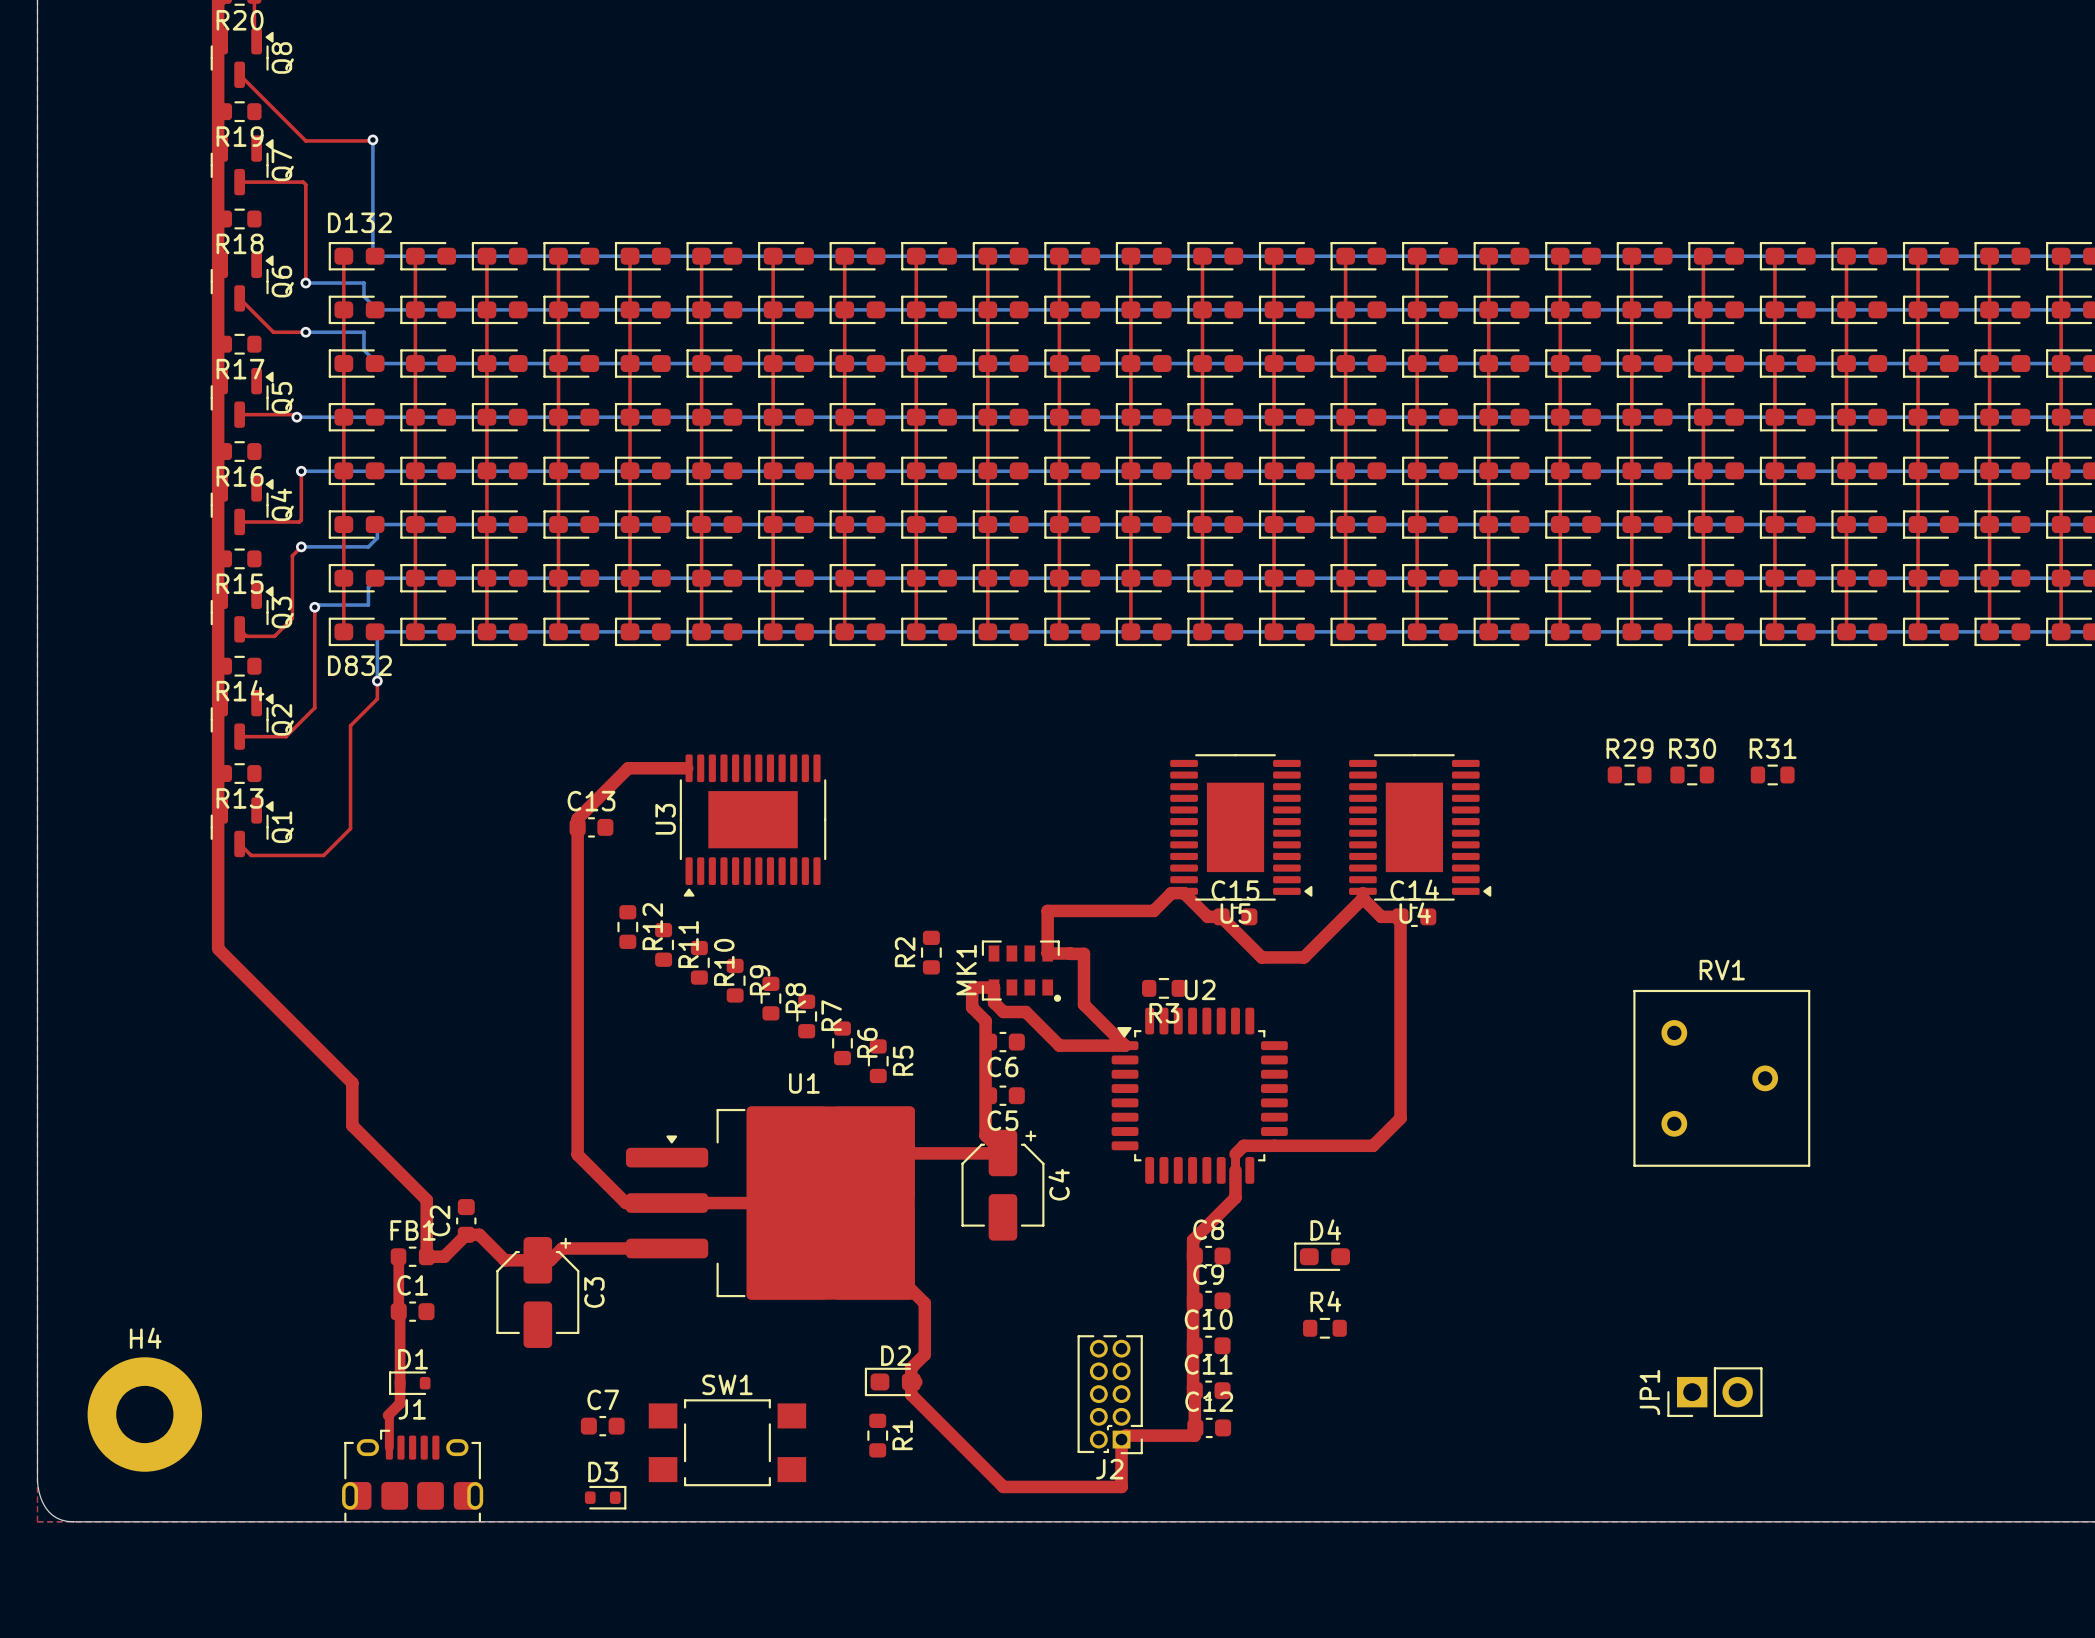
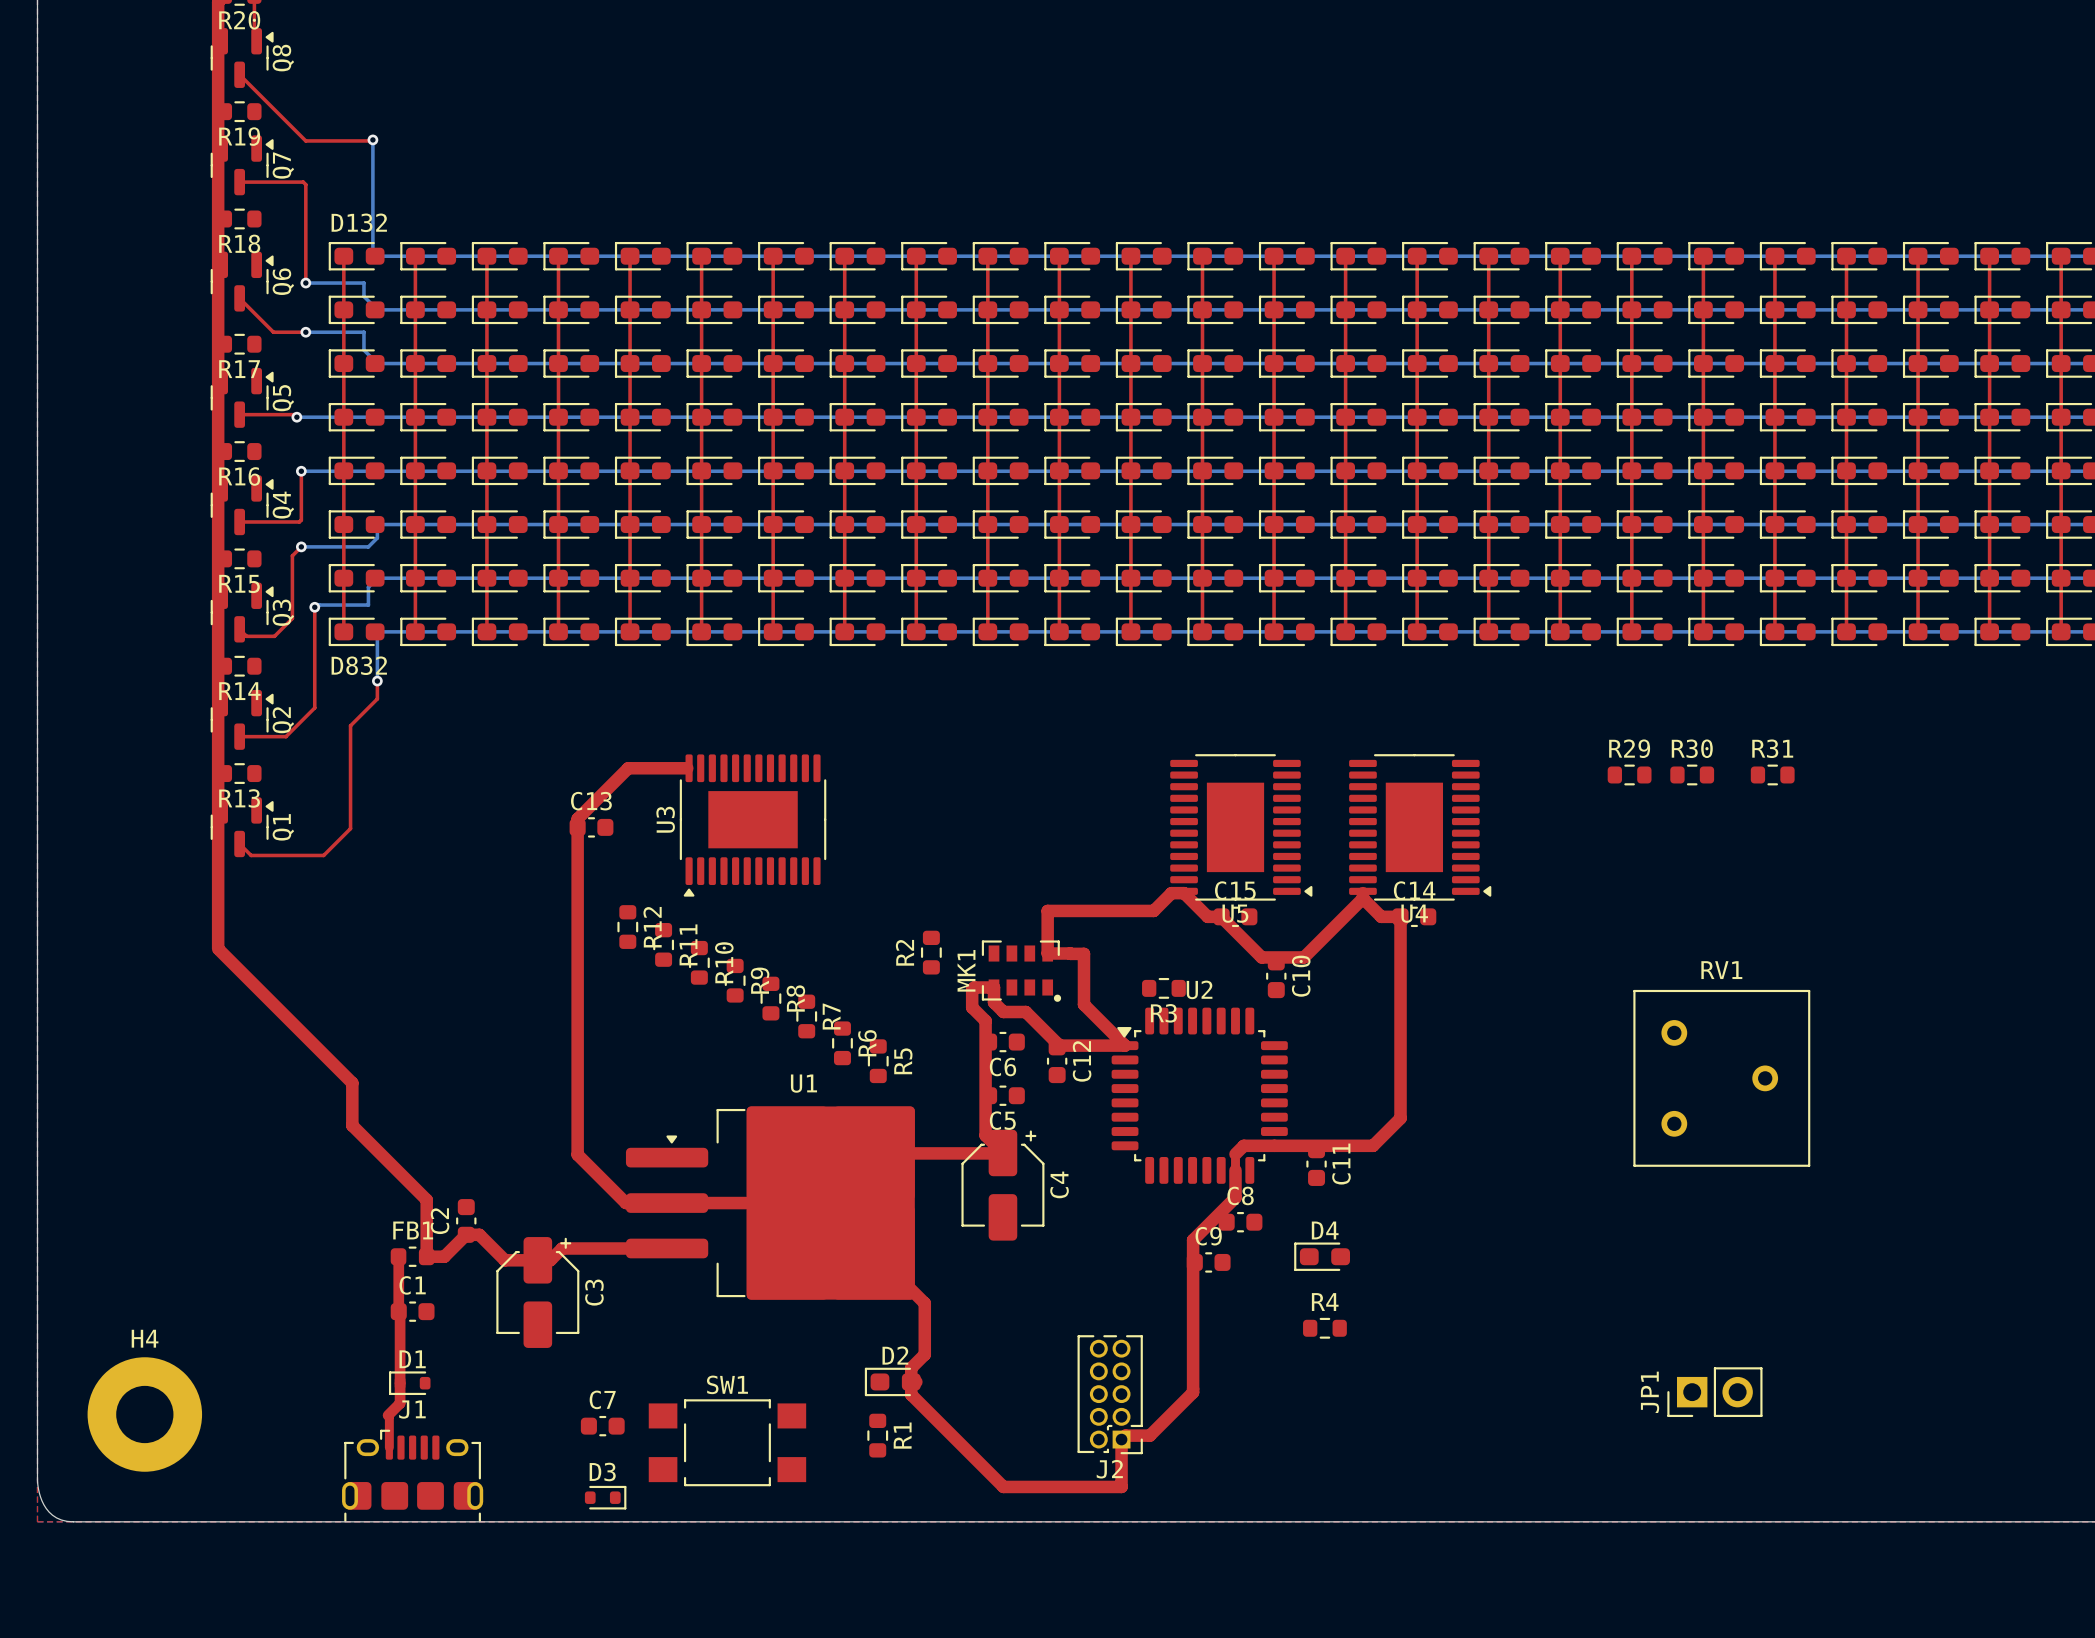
C8 position: (1208, 1256) -> (1240, 1222)
C9 position: (1208, 1300) -> (1208, 1262)
C10 rotation: 0° (1208, 1345) -> 90° clockwise (1276, 976)
C10 position: (1208, 1345) -> (1276, 976)
top track: (1193, 1389) (1194, 1390) (1194, 1435) (1149, 1435) -> (1193, 1389) (1193, 1392) (1149, 1435)
C11 rotation: 0° (1208, 1390) -> 90° clockwise (1316, 1164)
C11 position: (1208, 1390) -> (1316, 1164)
C12 rotation: 0° (1209, 1427) -> 90° clockwise (1057, 1061)
C12 position: (1209, 1427) -> (1057, 1061)

